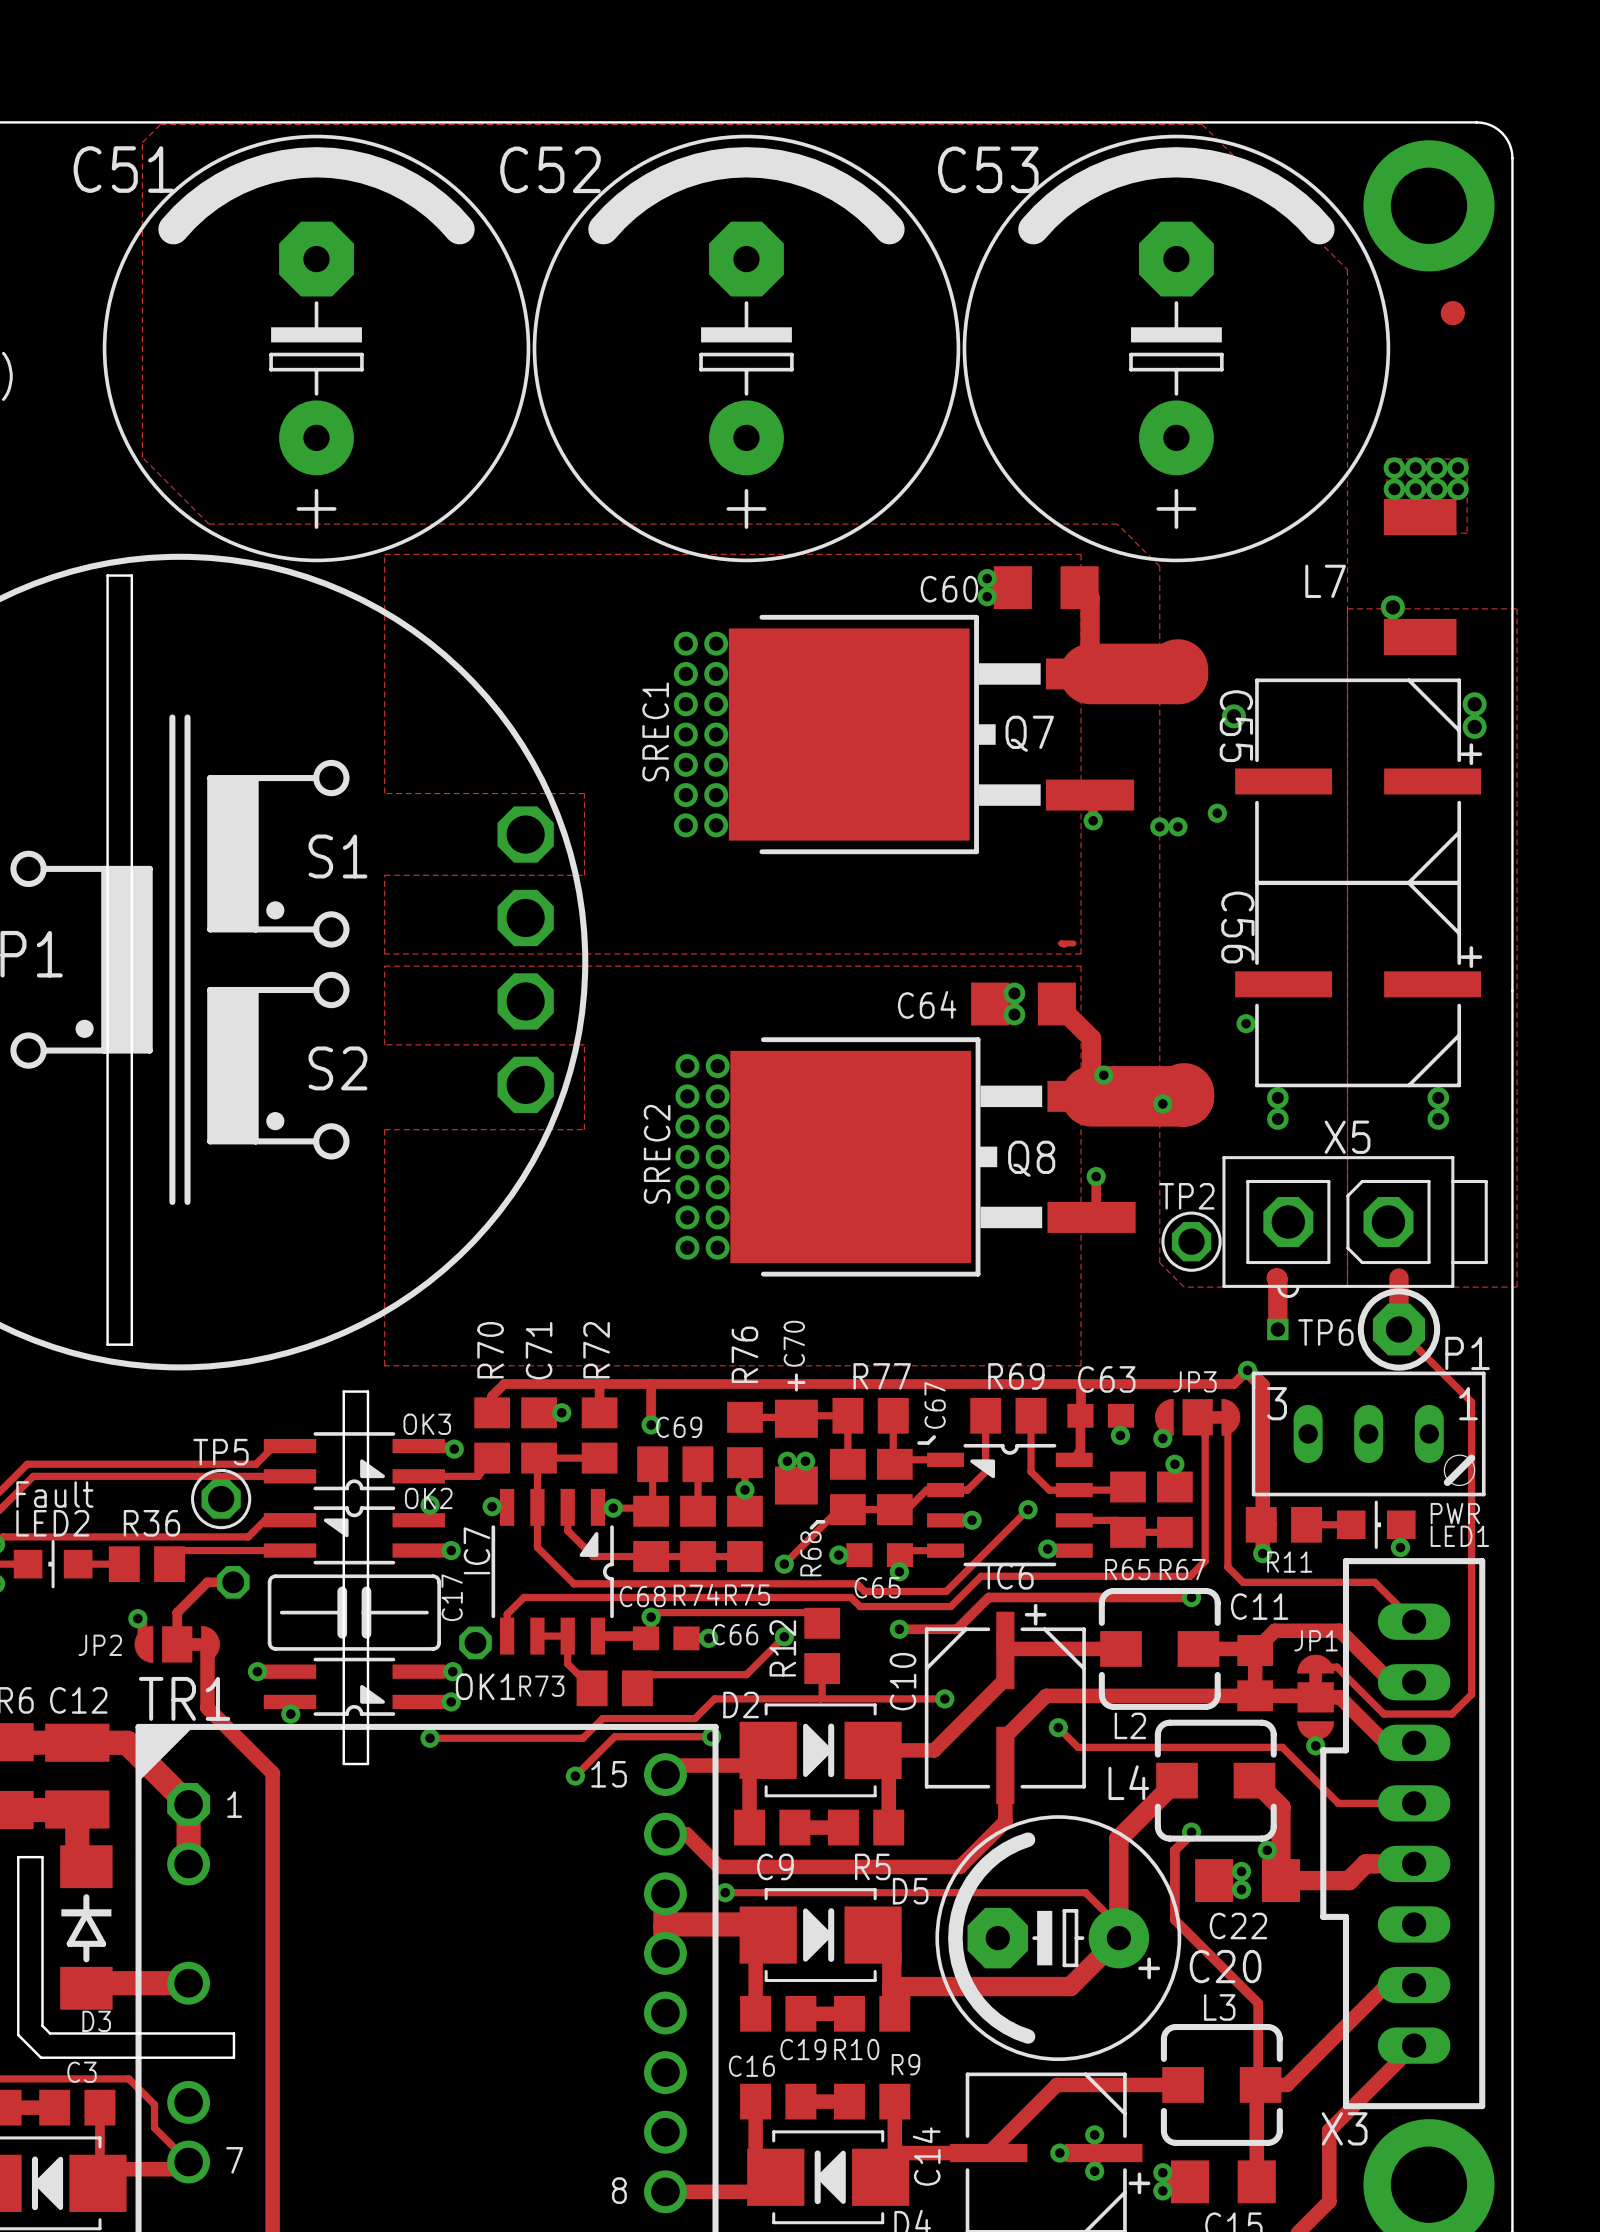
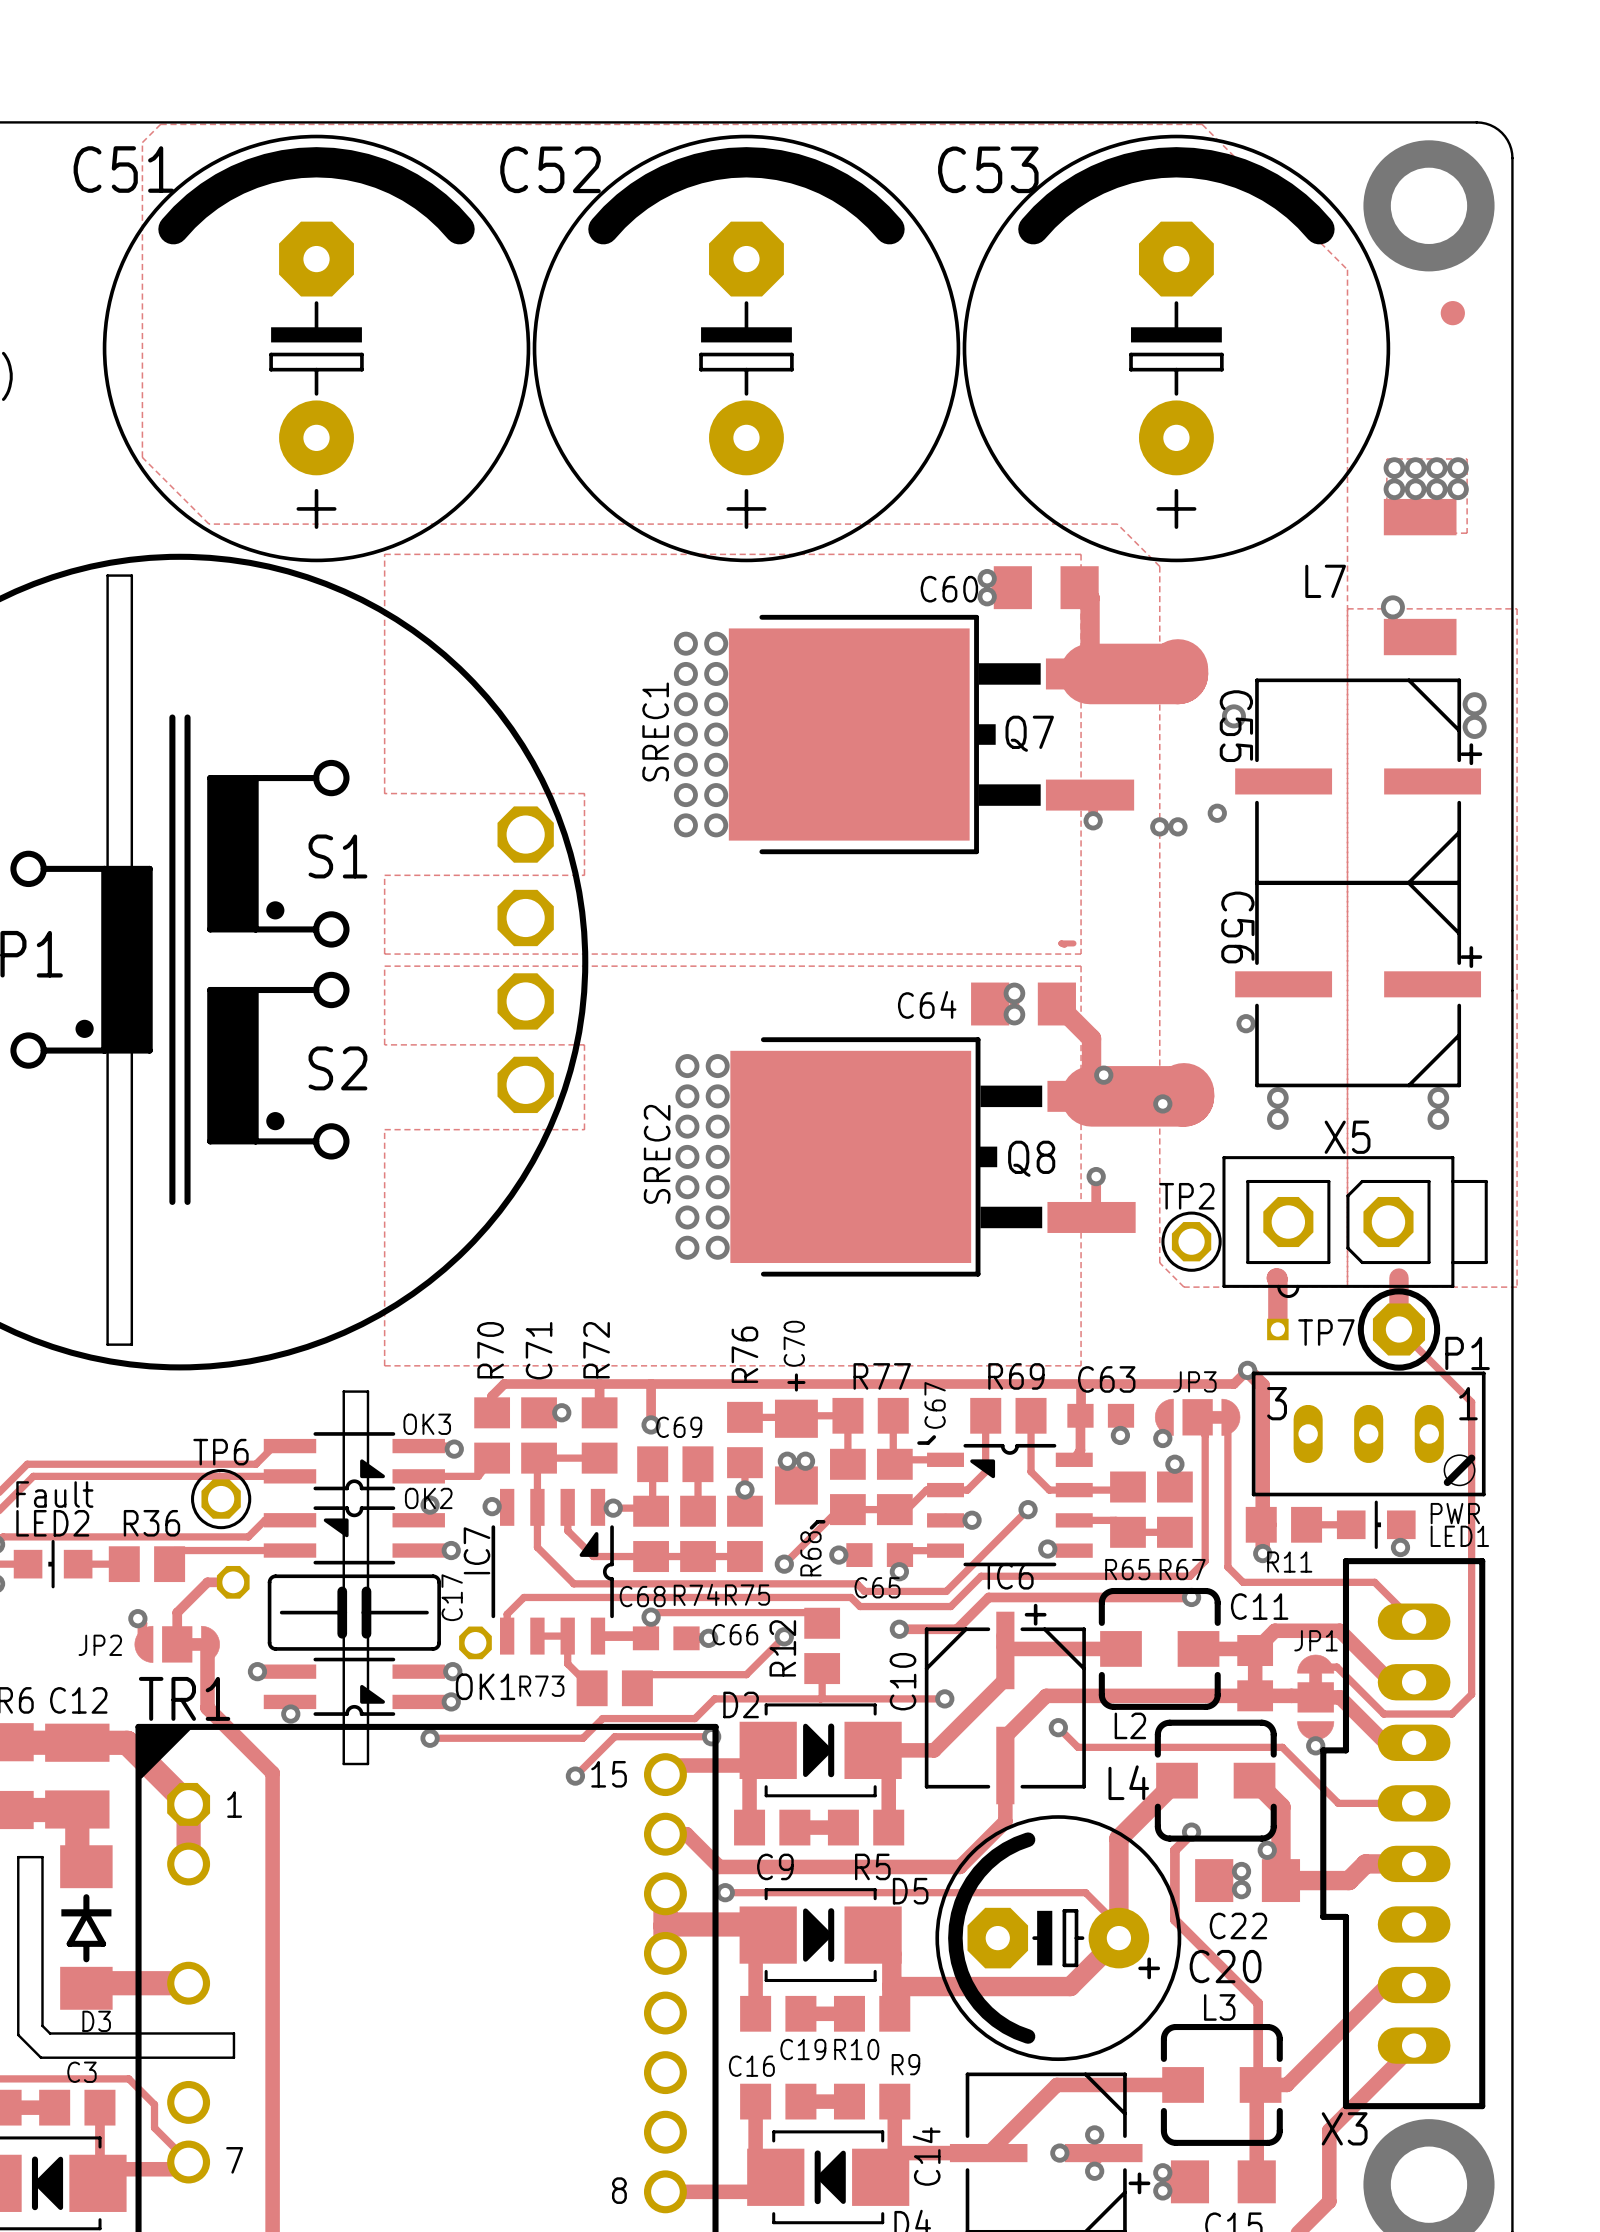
TP6 name: TP6 (1325, 1332) -> TP7 (1326, 1332)
TP5 name: TP5 (221, 1452) -> TP6 (221, 1452)

